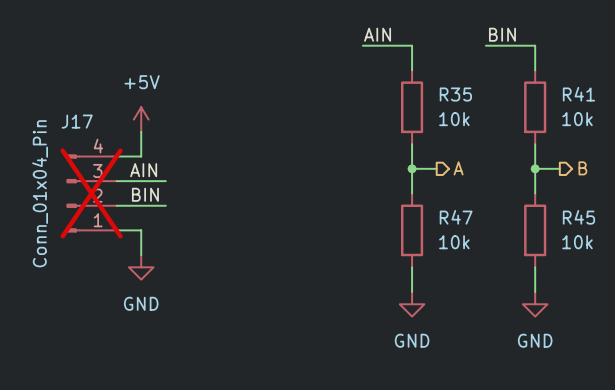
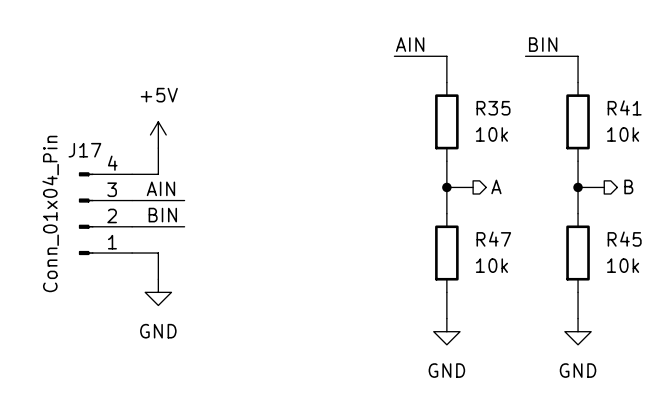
J17 name position: J17 (77, 121) -> J17 (84, 150)
J17 do-not-place cross: (91, 193) -> none

